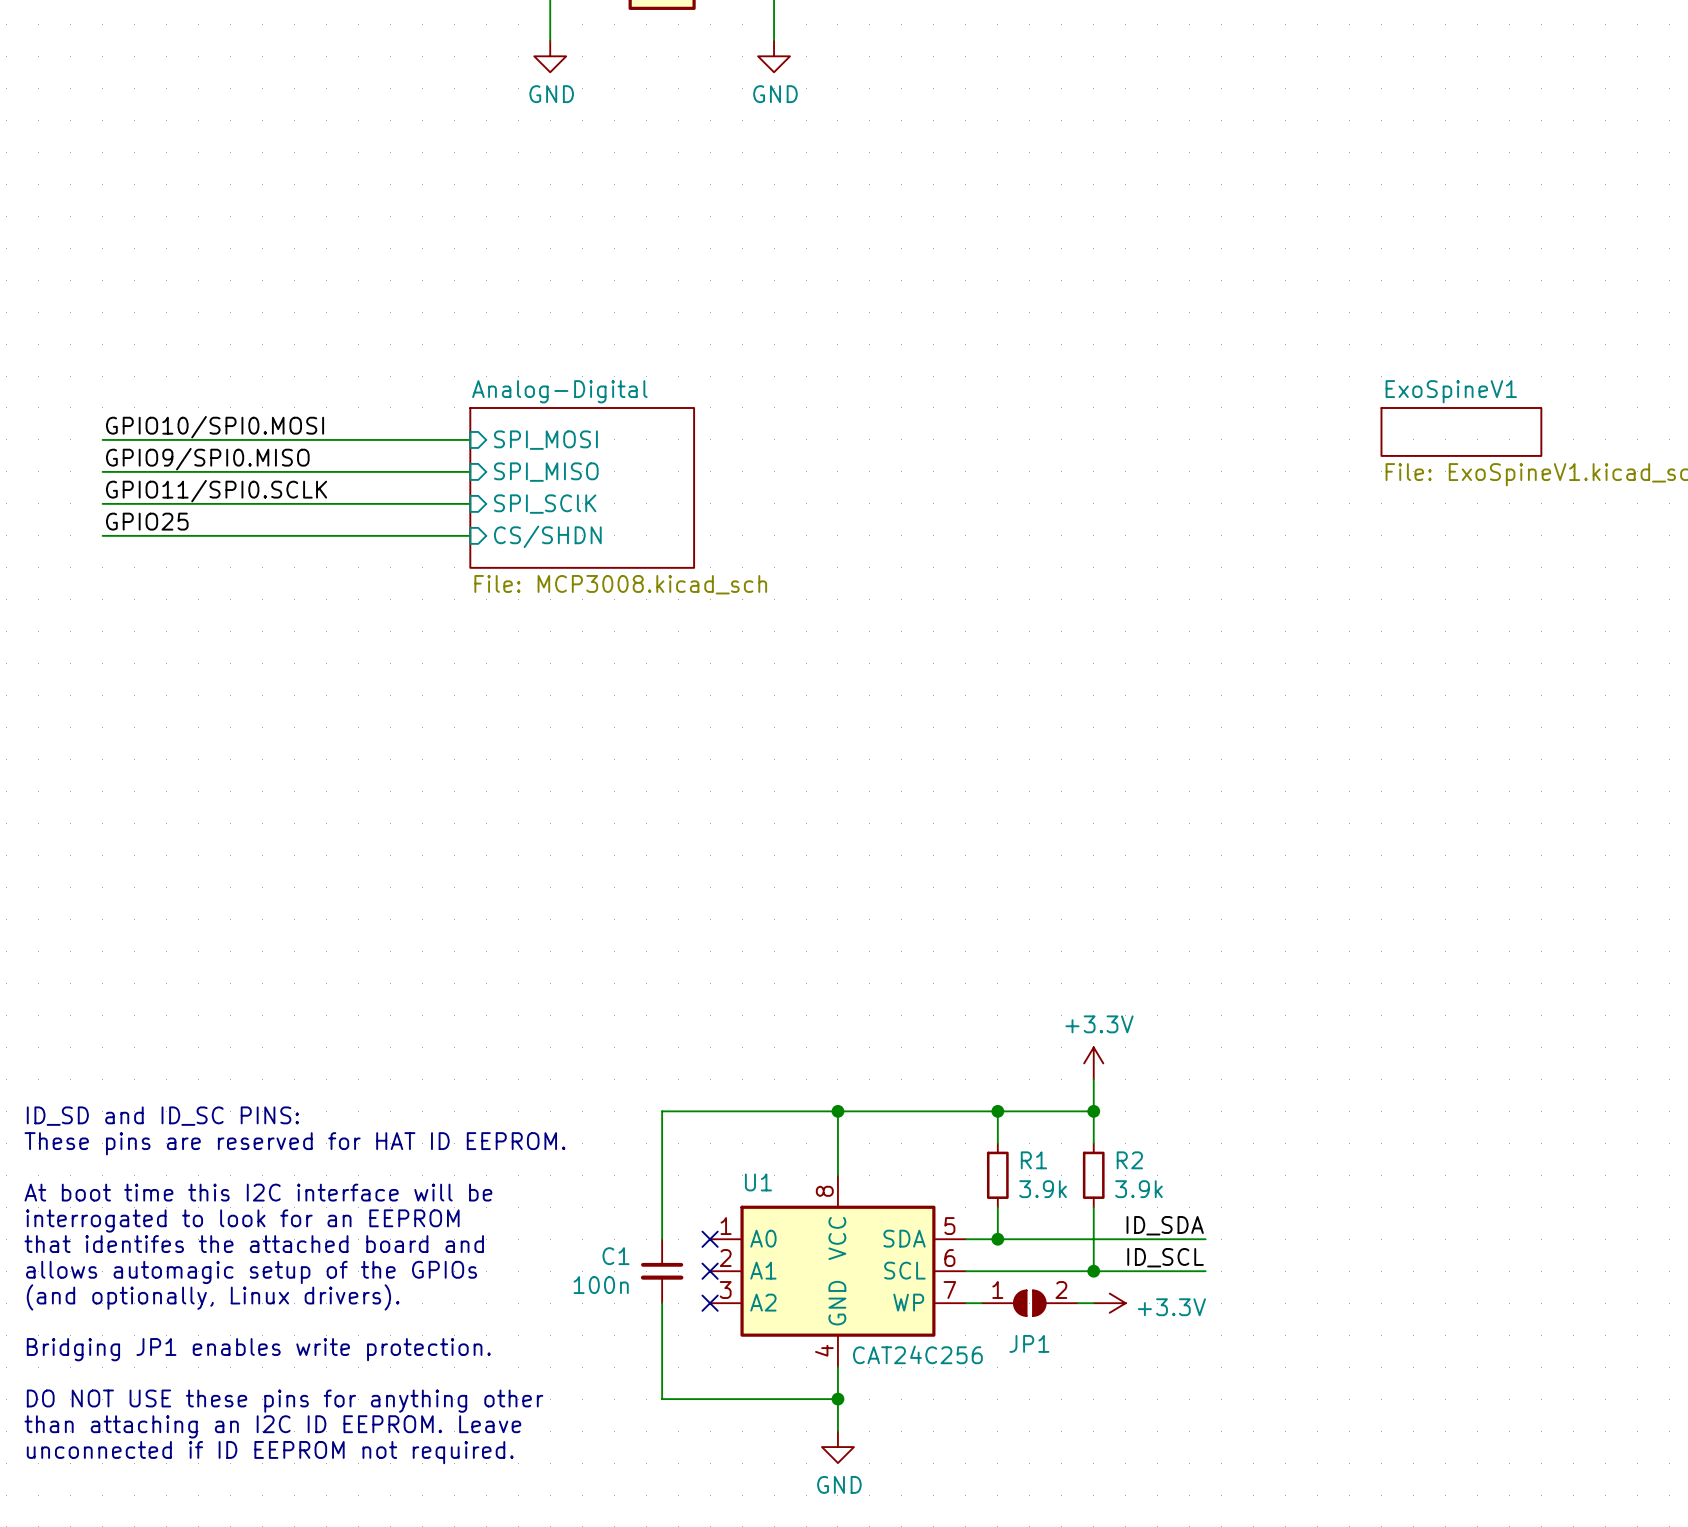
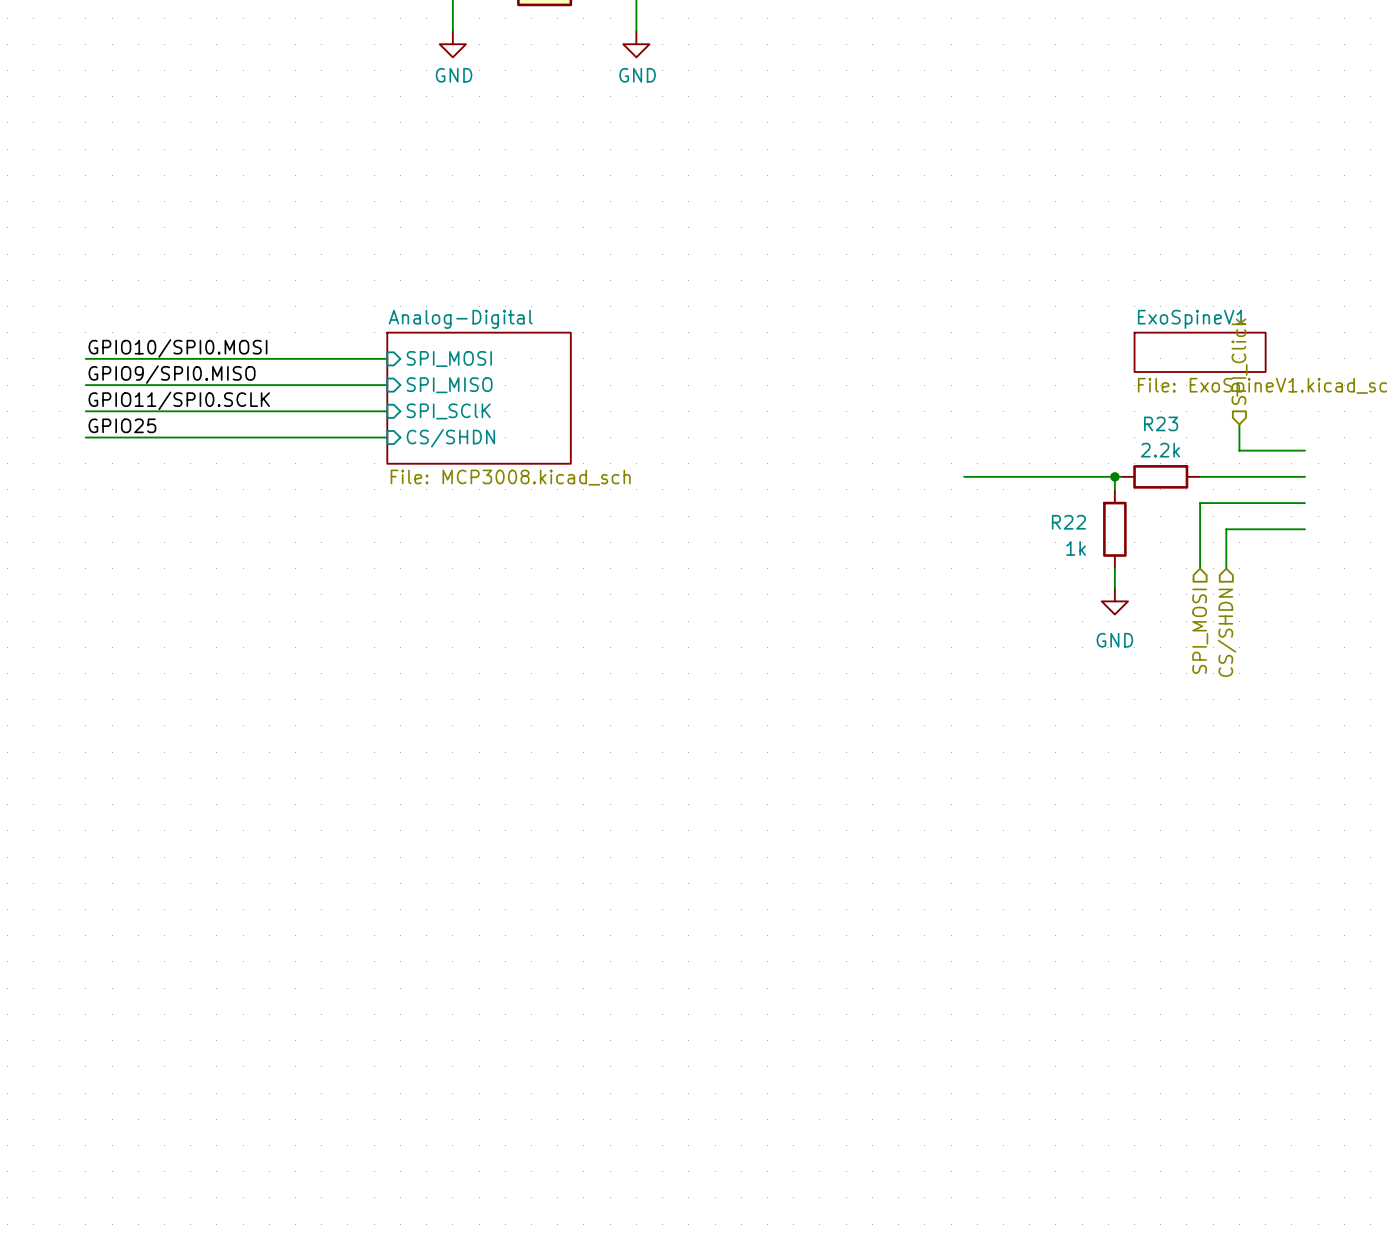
hierarchical label: none -> SPI_Click (1239, 361)
wire: none -> (1239, 424) (1239, 450) (1304, 450)
wire: none -> (964, 476) (1121, 476)
wire: none -> (1114, 476) (1114, 489)
junction: none -> (1114, 476)
R23: none -> 2.2k (1160, 476)
wire: none -> (1200, 476) (1304, 476)
wire: none -> (1304, 503) (1200, 503) (1200, 568)
R22: none -> 1k (1114, 529)
wire: none -> (1304, 529) (1226, 529) (1226, 568)
wire: none -> (1114, 568) (1114, 588)
power symbol: none -> GND (1114, 601)
hierarchical label: none -> SPI_MOSI (1200, 631)
hierarchical label: none -> CS/SHDN (1227, 632)
power symbol: +3.3V (1093, 1063) -> none
wire: (1093, 1079) (1093, 1143) -> none
wire: (837, 1111) (837, 1175) -> none
junction: (837, 1111) -> none
wire: (997, 1111) (997, 1143) -> none
junction: (997, 1111) -> none
wire: (1093, 1111) (662, 1111) (662, 1239) -> none
junction: (1093, 1111) -> none
text: ID_SD and ID_SC PINS: (162, 1116) -> none
text: These pins are reserved for HAT ID EEPROM. (294, 1143) -> none
R1: 3.9k (997, 1175) -> none
R2: 3.9k (1093, 1175) -> none
text: At boot time this I2C interface will be (258, 1192) -> none
wire: (997, 1207) (997, 1239) -> none
wire: (1093, 1207) (1093, 1271) -> none
text: interrogated to look for an EEPROM (242, 1220) -> none
label: ID_SDA (1165, 1225) -> none
no-connect mark: (710, 1239) -> none
wire: (965, 1239) (1205, 1239) -> none
junction: (997, 1239) -> none
text: that identifes the attached board and (254, 1244) -> none
label: ID_SCL (1165, 1257) -> none
C1: 100n (662, 1271) -> none
no-connect mark: (710, 1271) -> none
U1: CAT24C256 (837, 1271) -> none
wire: (965, 1271) (1205, 1271) -> none
junction: (1093, 1271) -> none
text: allows automagic setup of the GPIOs (251, 1272) -> none
text: (and optionally, Linux drivers). (213, 1297) -> none
wire: (662, 1303) (662, 1399) (837, 1399) -> none
no-connect mark: (710, 1303) -> none
wire: (965, 1303) (981, 1303) -> none
JP1: (1029, 1303) -> none
wire: (1077, 1303) (1093, 1303) -> none
power symbol: +3.3V (1109, 1303) -> none
text: Bridging JP1 enables write protection. (258, 1349) -> none
wire: (837, 1367) (837, 1431) -> none
junction: (837, 1399) -> none
text: DO NOT USE these pins for anything other (285, 1401) -> none
text: than attaching an I2C ID EEPROM. Leave (272, 1426) -> none
power symbol: GND (837, 1447) -> none
text: unconnected if ID EEPROM not required. (270, 1452) -> none

